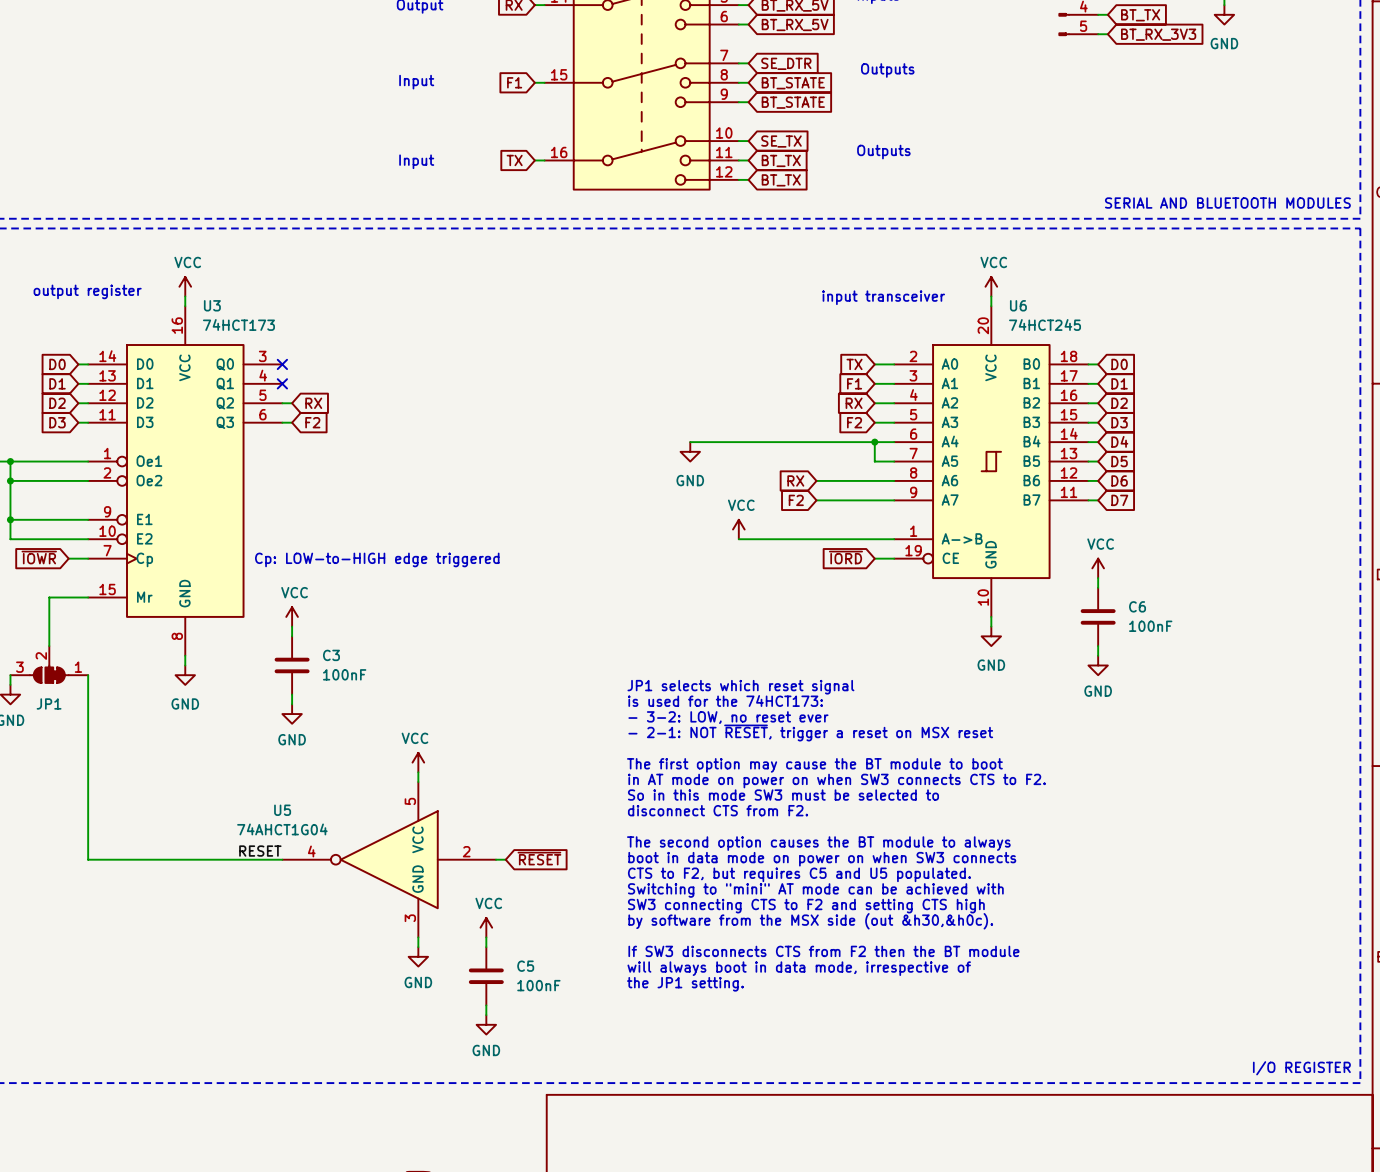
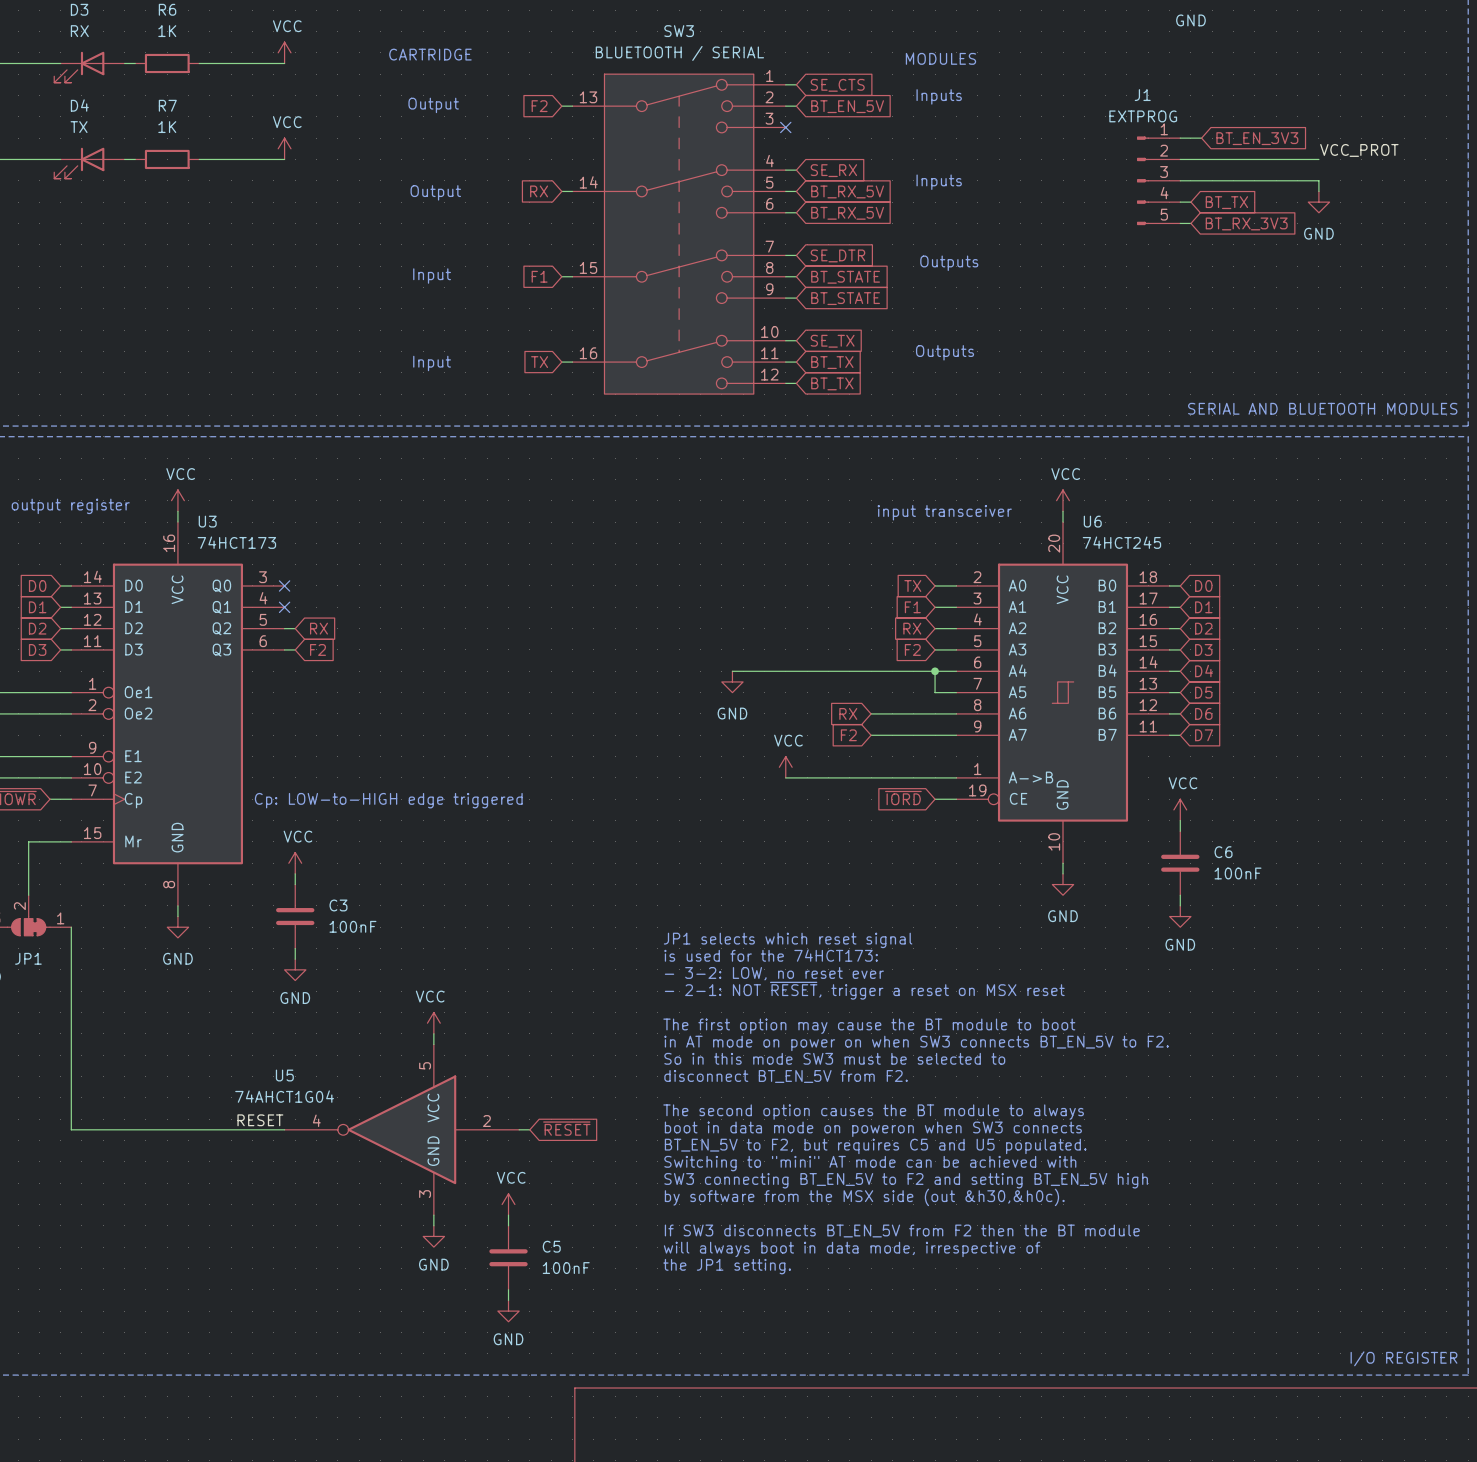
text: in AT mode on power on when SW3 connects CTS to F2. (836, 781) -> in AT mode on power on when SW3 connects BT_EN_5V to F2. (916, 1043)
text: disconnect CTS from F2. (718, 810) -> disconnect BT_EN_5V from F2. (786, 1076)
text: boot in data mode on power on when SW3 connects (822, 859) -> boot in data mode on poweron when SW3 connects (873, 1129)
text: CTS to F2, but requires C5 and U5 populated. (799, 874) -> BT_EN_5V to F2, but requires C5 and U5 populated. (875, 1146)
text: SW3 connecting CTS to F2 and setting CTS high (806, 906) -> SW3 connecting BT_EN_5V to F2 and setting BT_EN_5V high (906, 1180)
text: If SW3 disconnects CTS from F2 then the BT module (823, 951) -> If SW3 disconnects BT_EN_5V from F2 then the BT module (902, 1230)

